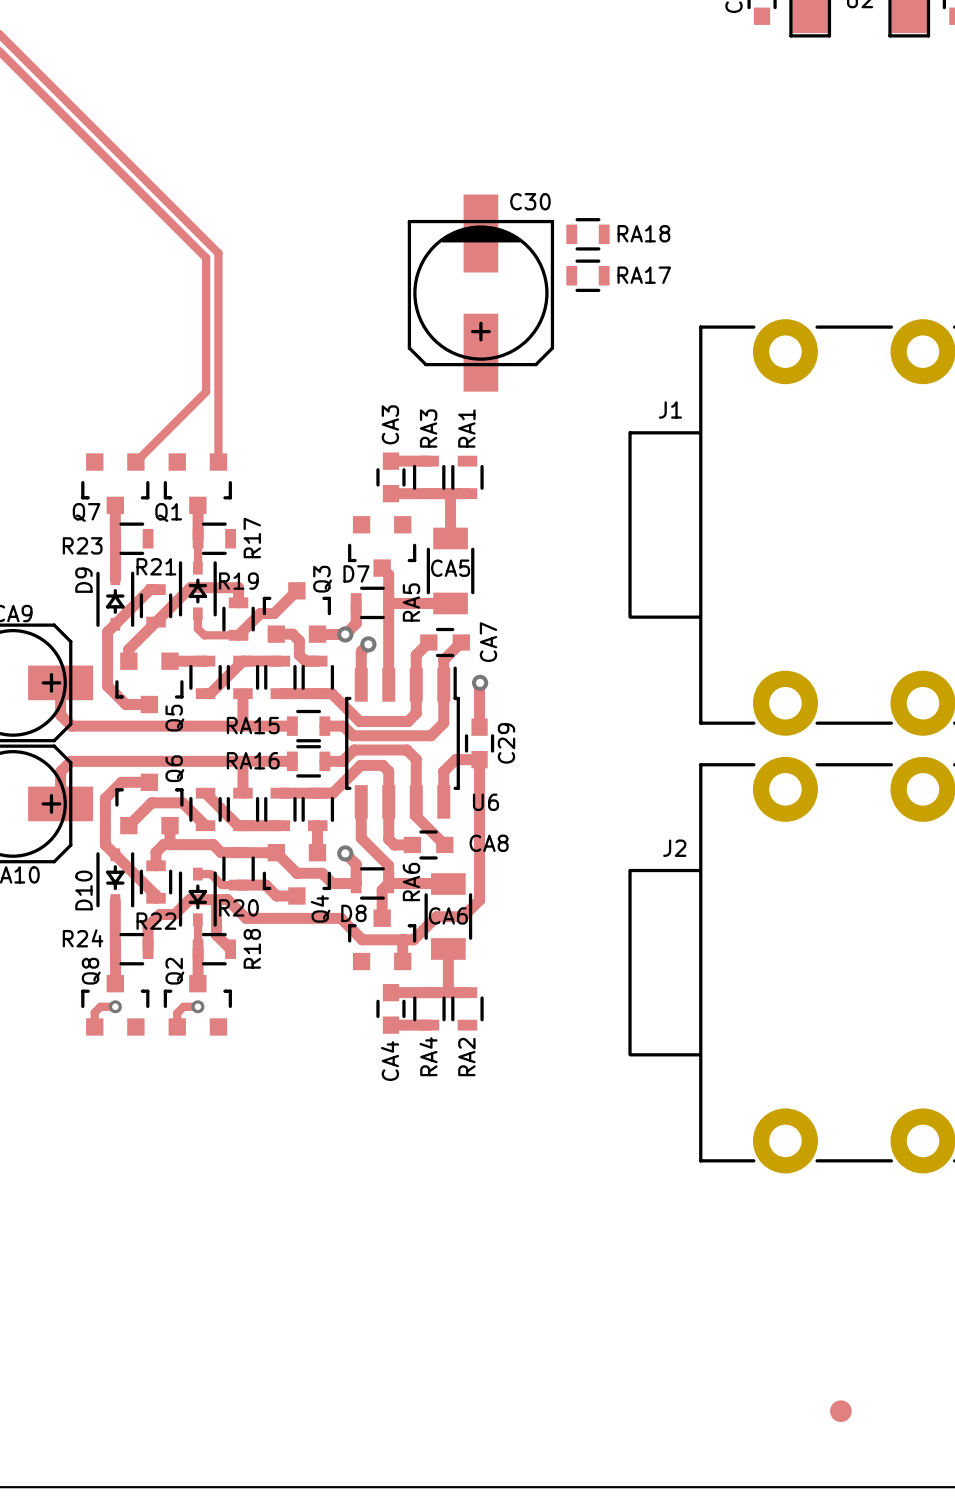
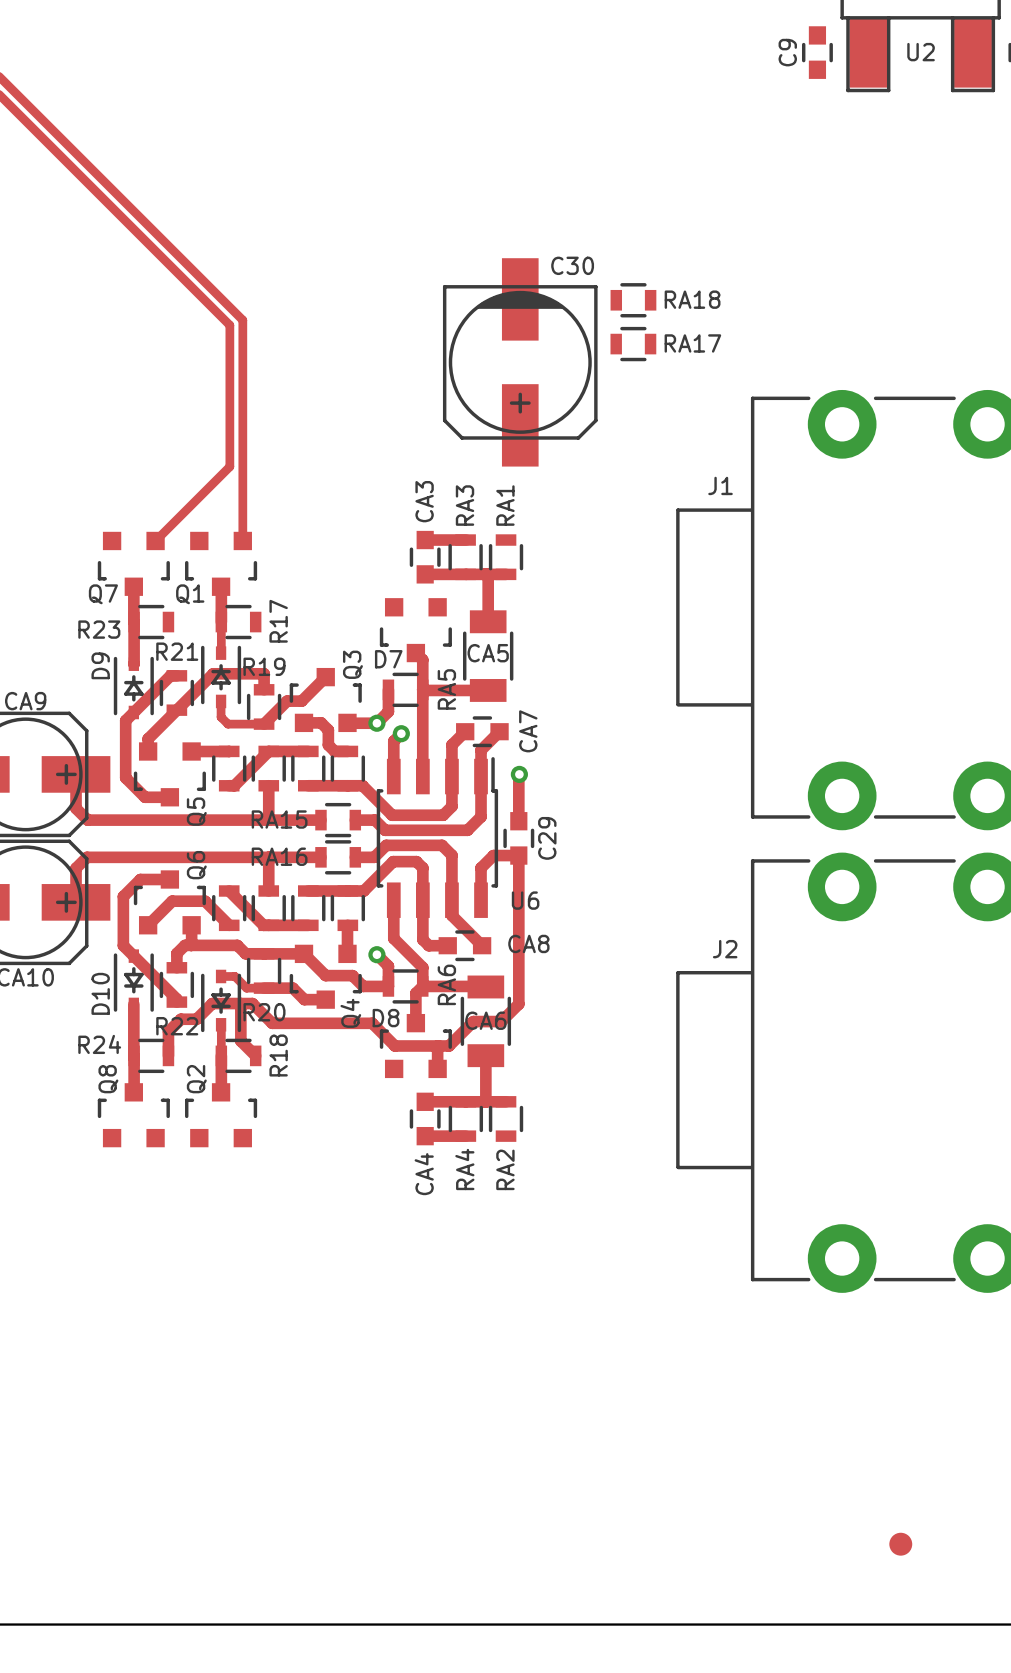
track: (115, 1006) (100, 1006) (94, 1012) (94, 1026) -> none
via: (115, 1006) -> none
track: (197, 1006) (183, 1006) (177, 1013) (177, 1026) -> none
via: (197, 1006) -> none

